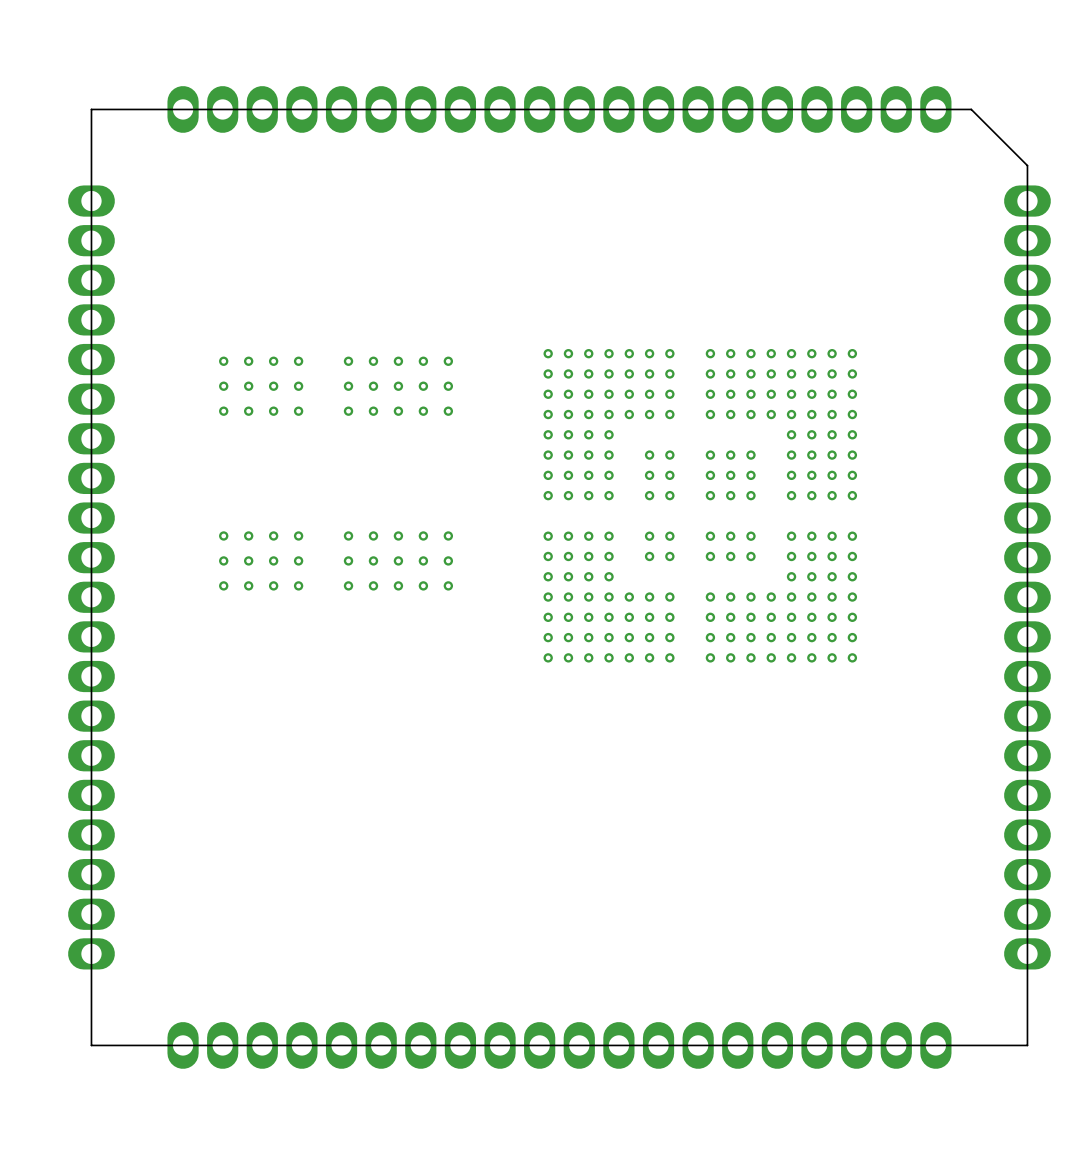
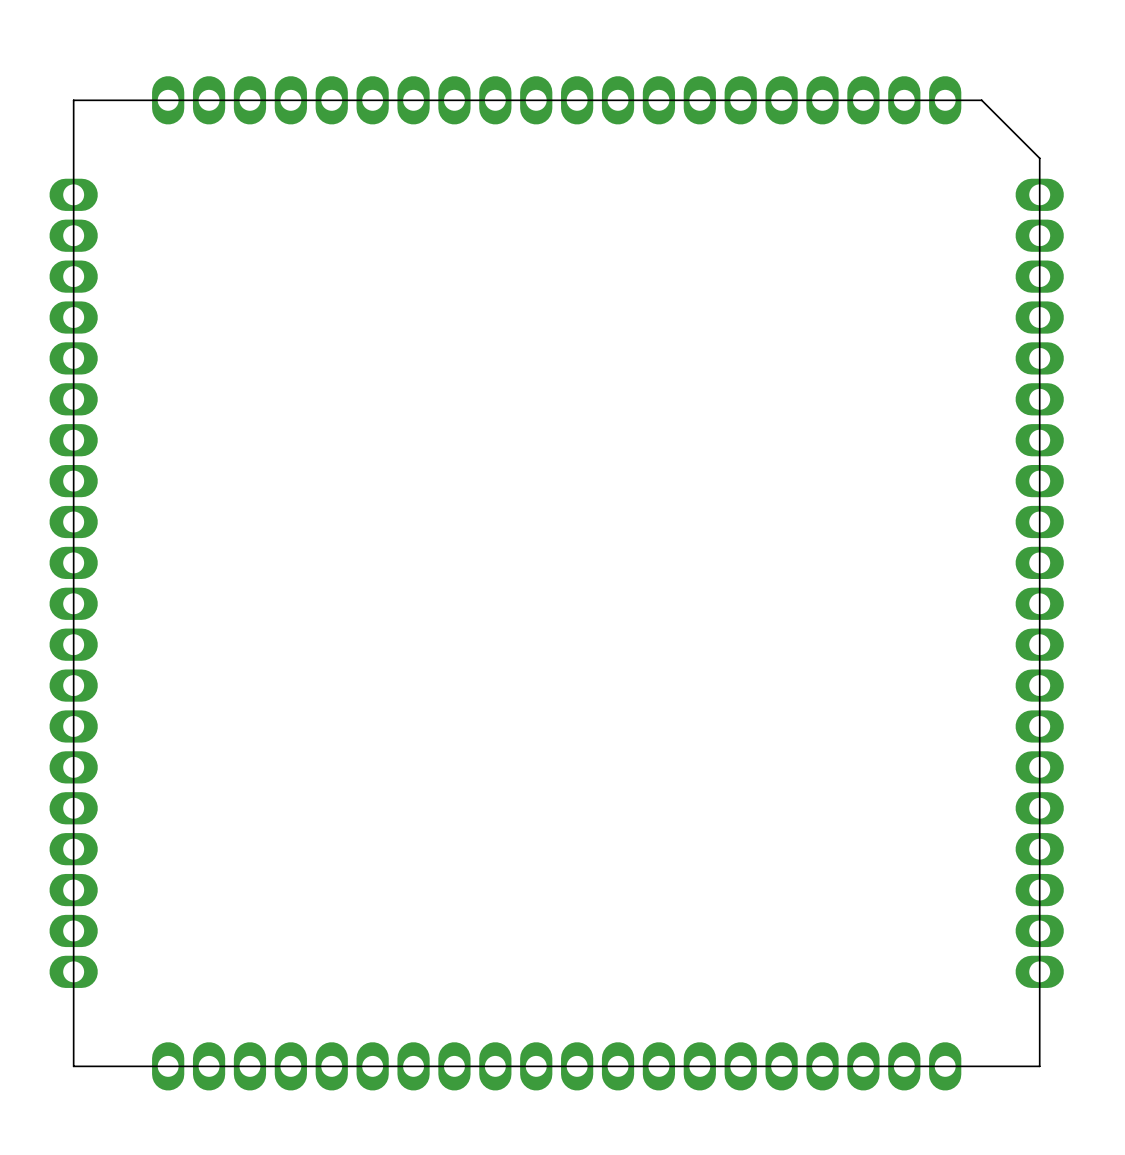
via: (548, 353) -> none
via: (568, 353) -> none
via: (588, 353) -> none
via: (609, 353) -> none
via: (629, 353) -> none
via: (649, 353) -> none
via: (669, 353) -> none
via: (710, 353) -> none
via: (730, 353) -> none
via: (750, 353) -> none
via: (771, 353) -> none
via: (791, 353) -> none
via: (811, 353) -> none
via: (832, 353) -> none
via: (852, 353) -> none
via: (223, 361) -> none
via: (248, 361) -> none
via: (273, 361) -> none
via: (298, 361) -> none
via: (348, 361) -> none
via: (373, 361) -> none
via: (398, 361) -> none
via: (423, 361) -> none
via: (448, 361) -> none
via: (548, 373) -> none
via: (568, 373) -> none
via: (588, 373) -> none
via: (609, 373) -> none
via: (629, 373) -> none
via: (649, 373) -> none
via: (669, 373) -> none
via: (710, 373) -> none
via: (730, 373) -> none
via: (750, 373) -> none
via: (771, 373) -> none
via: (791, 373) -> none
via: (811, 373) -> none
via: (832, 373) -> none
via: (852, 373) -> none
via: (223, 386) -> none
via: (248, 386) -> none
via: (273, 386) -> none
via: (298, 386) -> none
via: (348, 386) -> none
via: (373, 386) -> none
via: (398, 386) -> none
via: (423, 386) -> none
via: (448, 386) -> none
via: (548, 394) -> none
via: (568, 394) -> none
via: (588, 394) -> none
via: (609, 394) -> none
via: (629, 394) -> none
via: (649, 394) -> none
via: (669, 394) -> none
via: (710, 394) -> none
via: (730, 394) -> none
via: (750, 394) -> none
via: (771, 394) -> none
via: (791, 394) -> none
via: (811, 394) -> none
via: (832, 394) -> none
via: (852, 394) -> none
via: (223, 411) -> none
via: (248, 411) -> none
via: (273, 411) -> none
via: (298, 411) -> none
via: (348, 411) -> none
via: (373, 411) -> none
via: (398, 411) -> none
via: (423, 411) -> none
via: (448, 411) -> none
via: (548, 414) -> none
via: (568, 414) -> none
via: (588, 414) -> none
via: (609, 414) -> none
via: (629, 414) -> none
via: (649, 414) -> none
via: (669, 414) -> none
via: (710, 414) -> none
via: (730, 414) -> none
via: (750, 414) -> none
via: (771, 414) -> none
via: (791, 414) -> none
via: (811, 414) -> none
via: (832, 414) -> none
via: (852, 414) -> none
via: (548, 434) -> none
via: (568, 434) -> none
via: (588, 434) -> none
via: (609, 434) -> none
via: (791, 434) -> none
via: (811, 434) -> none
via: (832, 434) -> none
via: (852, 434) -> none
via: (548, 455) -> none
via: (568, 455) -> none
via: (588, 455) -> none
via: (609, 455) -> none
via: (649, 455) -> none
via: (669, 455) -> none
via: (710, 455) -> none
via: (730, 455) -> none
via: (750, 455) -> none
via: (791, 455) -> none
via: (811, 455) -> none
via: (832, 455) -> none
via: (852, 455) -> none
via: (548, 475) -> none
via: (568, 475) -> none
via: (588, 475) -> none
via: (609, 475) -> none
via: (649, 475) -> none
via: (669, 475) -> none
via: (710, 475) -> none
via: (730, 475) -> none
via: (750, 475) -> none
via: (791, 475) -> none
via: (811, 475) -> none
via: (832, 475) -> none
via: (852, 475) -> none
via: (548, 495) -> none
via: (568, 495) -> none
via: (588, 495) -> none
via: (609, 495) -> none
via: (649, 495) -> none
via: (669, 495) -> none
via: (710, 495) -> none
via: (730, 495) -> none
via: (750, 495) -> none
via: (791, 495) -> none
via: (811, 495) -> none
via: (832, 495) -> none
via: (852, 495) -> none
via: (223, 535) -> none
via: (248, 535) -> none
via: (273, 535) -> none
via: (298, 535) -> none
via: (348, 535) -> none
via: (373, 535) -> none
via: (398, 535) -> none
via: (423, 535) -> none
via: (448, 535) -> none
via: (548, 536) -> none
via: (568, 536) -> none
via: (588, 536) -> none
via: (609, 536) -> none
via: (649, 536) -> none
via: (669, 536) -> none
via: (710, 536) -> none
via: (730, 536) -> none
via: (750, 536) -> none
via: (791, 536) -> none
via: (811, 536) -> none
via: (832, 536) -> none
via: (852, 536) -> none
via: (548, 556) -> none
via: (568, 556) -> none
via: (588, 556) -> none
via: (609, 556) -> none
via: (649, 556) -> none
via: (669, 556) -> none
via: (710, 556) -> none
via: (730, 556) -> none
via: (750, 556) -> none
via: (791, 556) -> none
via: (811, 556) -> none
via: (832, 556) -> none
via: (852, 556) -> none
via: (223, 560) -> none
via: (248, 560) -> none
via: (273, 560) -> none
via: (298, 560) -> none
via: (348, 560) -> none
via: (373, 560) -> none
via: (398, 560) -> none
via: (423, 560) -> none
via: (448, 560) -> none
via: (548, 576) -> none
via: (568, 576) -> none
via: (588, 576) -> none
via: (609, 576) -> none
via: (791, 576) -> none
via: (811, 576) -> none
via: (832, 576) -> none
via: (852, 576) -> none
via: (223, 585) -> none
via: (248, 585) -> none
via: (273, 585) -> none
via: (298, 585) -> none
via: (348, 585) -> none
via: (373, 585) -> none
via: (398, 585) -> none
via: (423, 585) -> none
via: (448, 585) -> none
via: (548, 597) -> none
via: (568, 597) -> none
via: (588, 597) -> none
via: (609, 597) -> none
via: (629, 597) -> none
via: (649, 597) -> none
via: (669, 597) -> none
via: (710, 597) -> none
via: (730, 597) -> none
via: (750, 597) -> none
via: (771, 597) -> none
via: (791, 597) -> none
via: (811, 597) -> none
via: (832, 597) -> none
via: (852, 597) -> none
via: (548, 617) -> none
via: (568, 617) -> none
via: (588, 617) -> none
via: (609, 617) -> none
via: (629, 617) -> none
via: (649, 617) -> none
via: (669, 617) -> none
via: (710, 617) -> none
via: (730, 617) -> none
via: (750, 617) -> none
via: (771, 617) -> none
via: (791, 617) -> none
via: (811, 617) -> none
via: (832, 617) -> none
via: (852, 617) -> none
via: (548, 637) -> none
via: (568, 637) -> none
via: (588, 637) -> none
via: (609, 637) -> none
via: (629, 637) -> none
via: (649, 637) -> none
via: (669, 637) -> none
via: (710, 637) -> none
via: (730, 637) -> none
via: (750, 637) -> none
via: (771, 637) -> none
via: (791, 637) -> none
via: (811, 637) -> none
via: (832, 637) -> none
via: (852, 637) -> none
via: (548, 657) -> none
via: (568, 657) -> none
via: (588, 657) -> none
via: (609, 657) -> none
via: (629, 657) -> none
via: (649, 657) -> none
via: (669, 657) -> none
via: (710, 657) -> none
via: (730, 657) -> none
via: (750, 657) -> none
via: (771, 657) -> none
via: (791, 657) -> none
via: (811, 657) -> none
via: (832, 657) -> none
via: (852, 657) -> none

